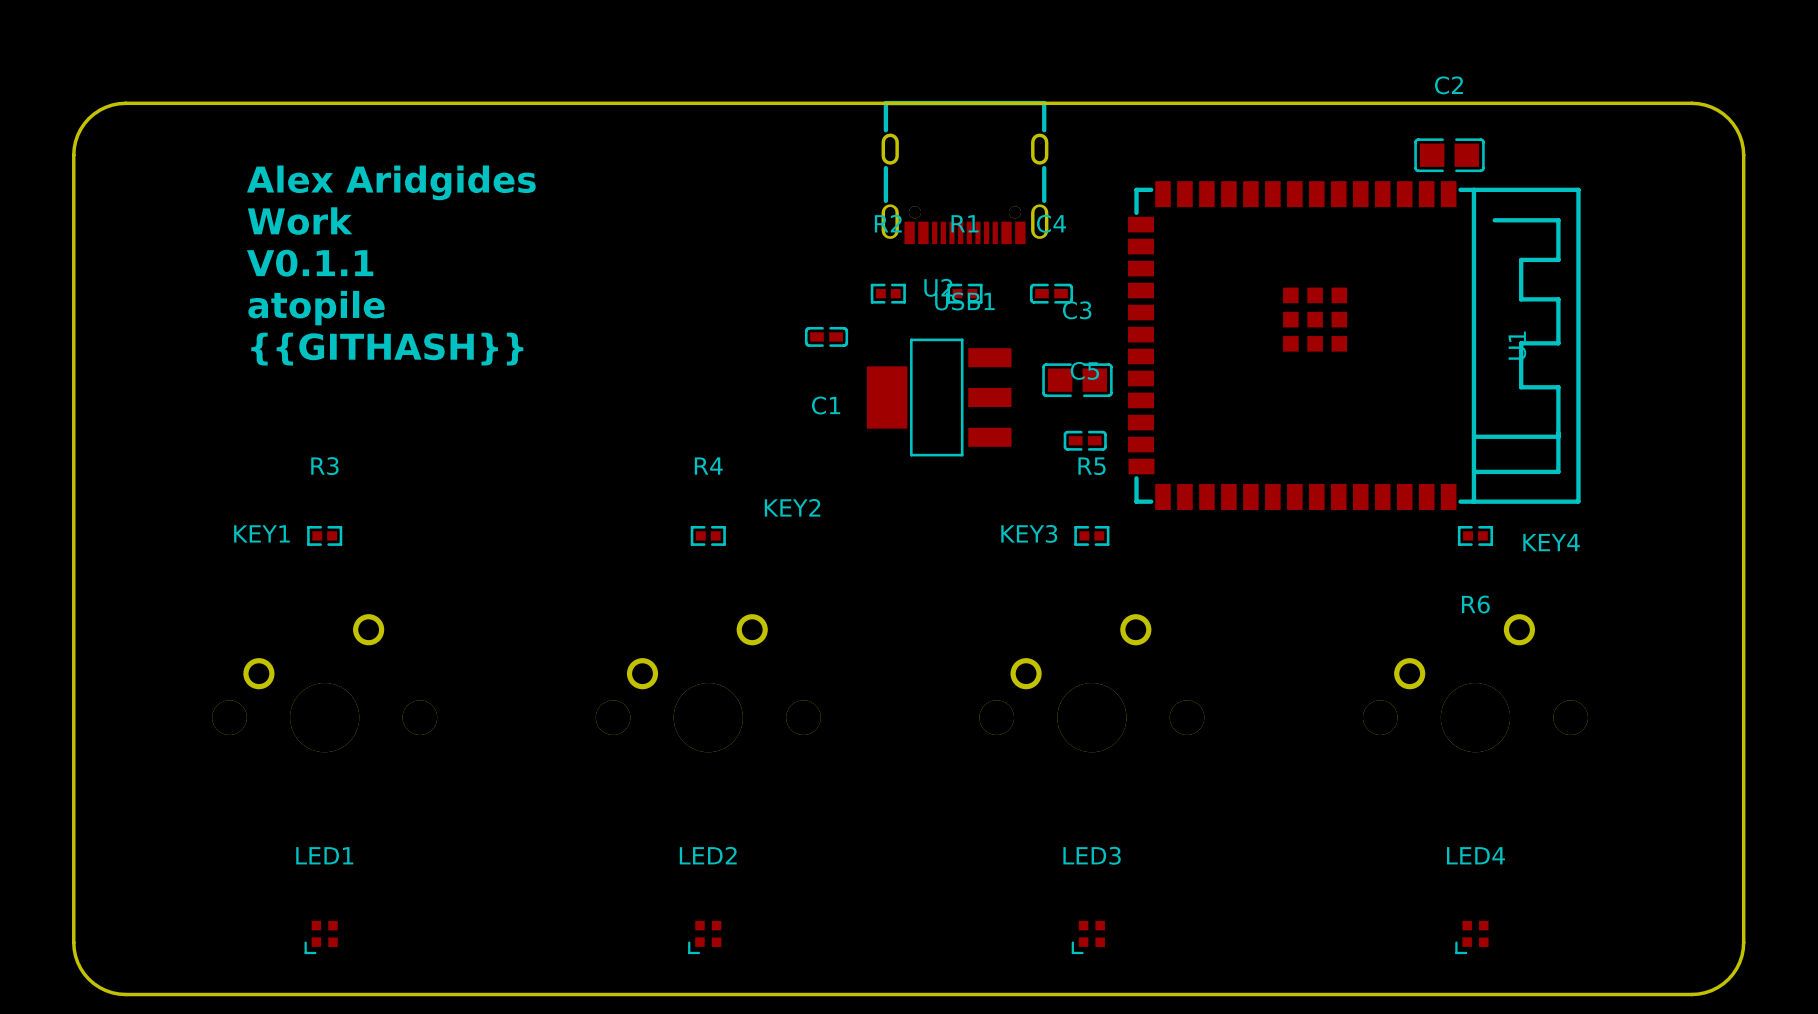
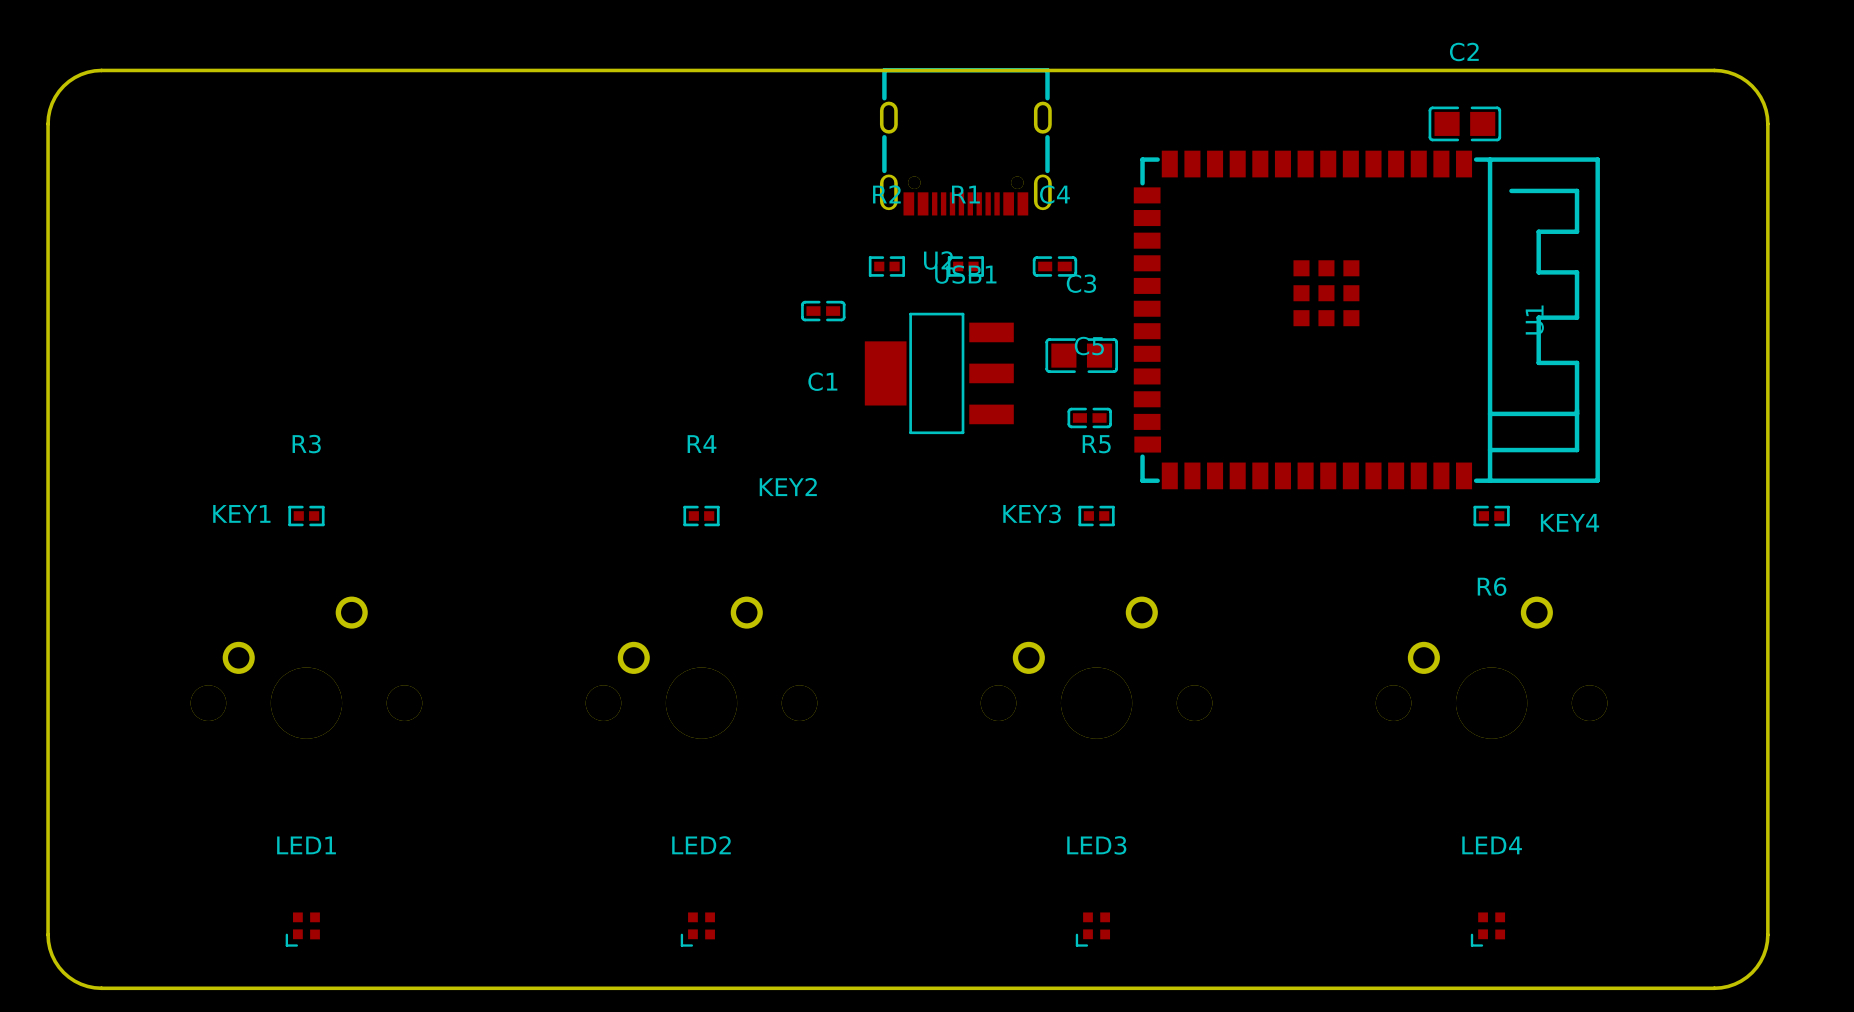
text: Alex Aridgides (391, 182) -> none
text: Work (300, 221) -> none
text: V0.1.1 (310, 263) -> none
text: atopile (316, 308) -> none
text: {{GITHASH}} (387, 349) -> none

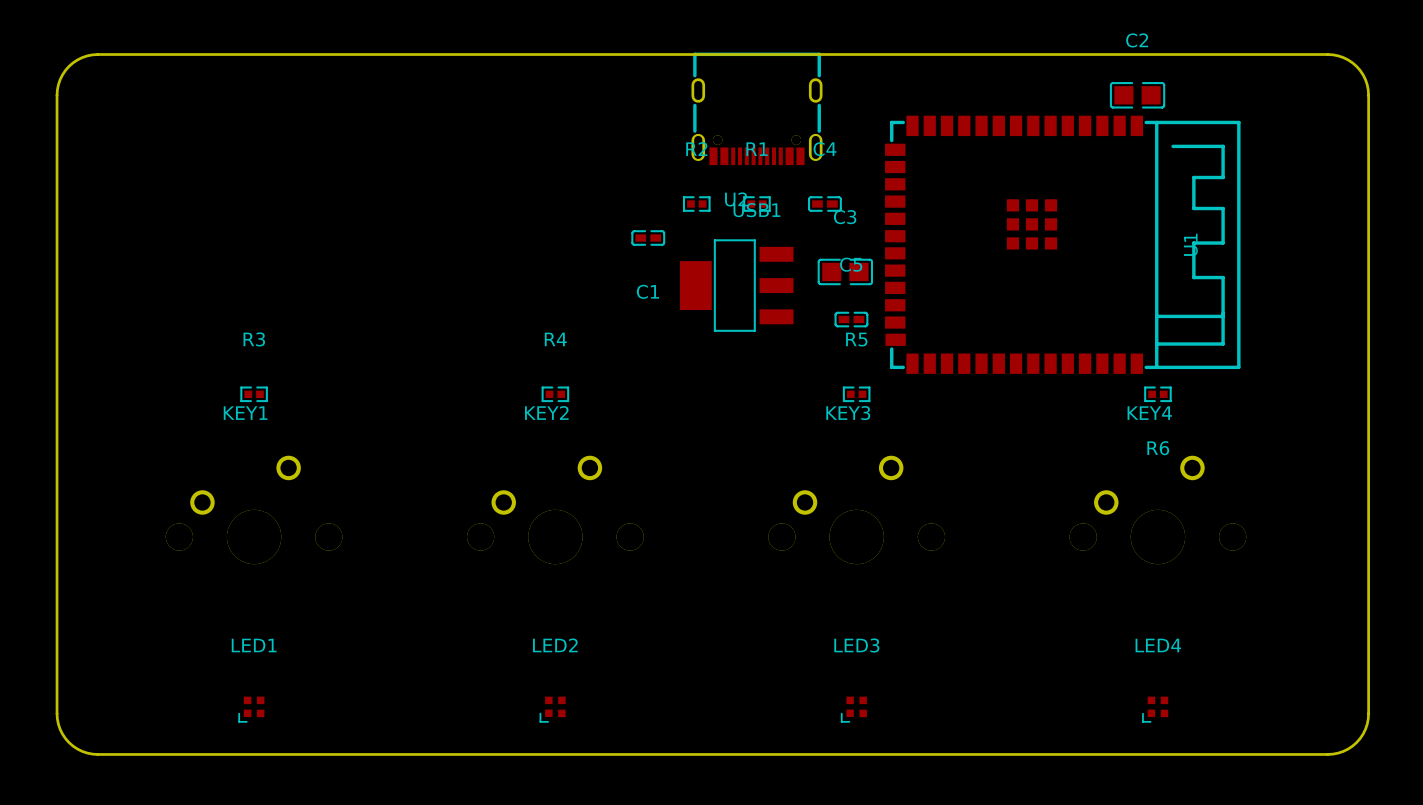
KEY2 name position: KEY2 (788, 487) -> KEY2 (546, 412)
KEY1 name position: KEY1 (241, 513) -> KEY1 (245, 413)
KEY3 name position: KEY3 (1032, 513) -> KEY3 (848, 413)
KEY4 name position: KEY4 (1570, 522) -> KEY4 (1149, 413)

